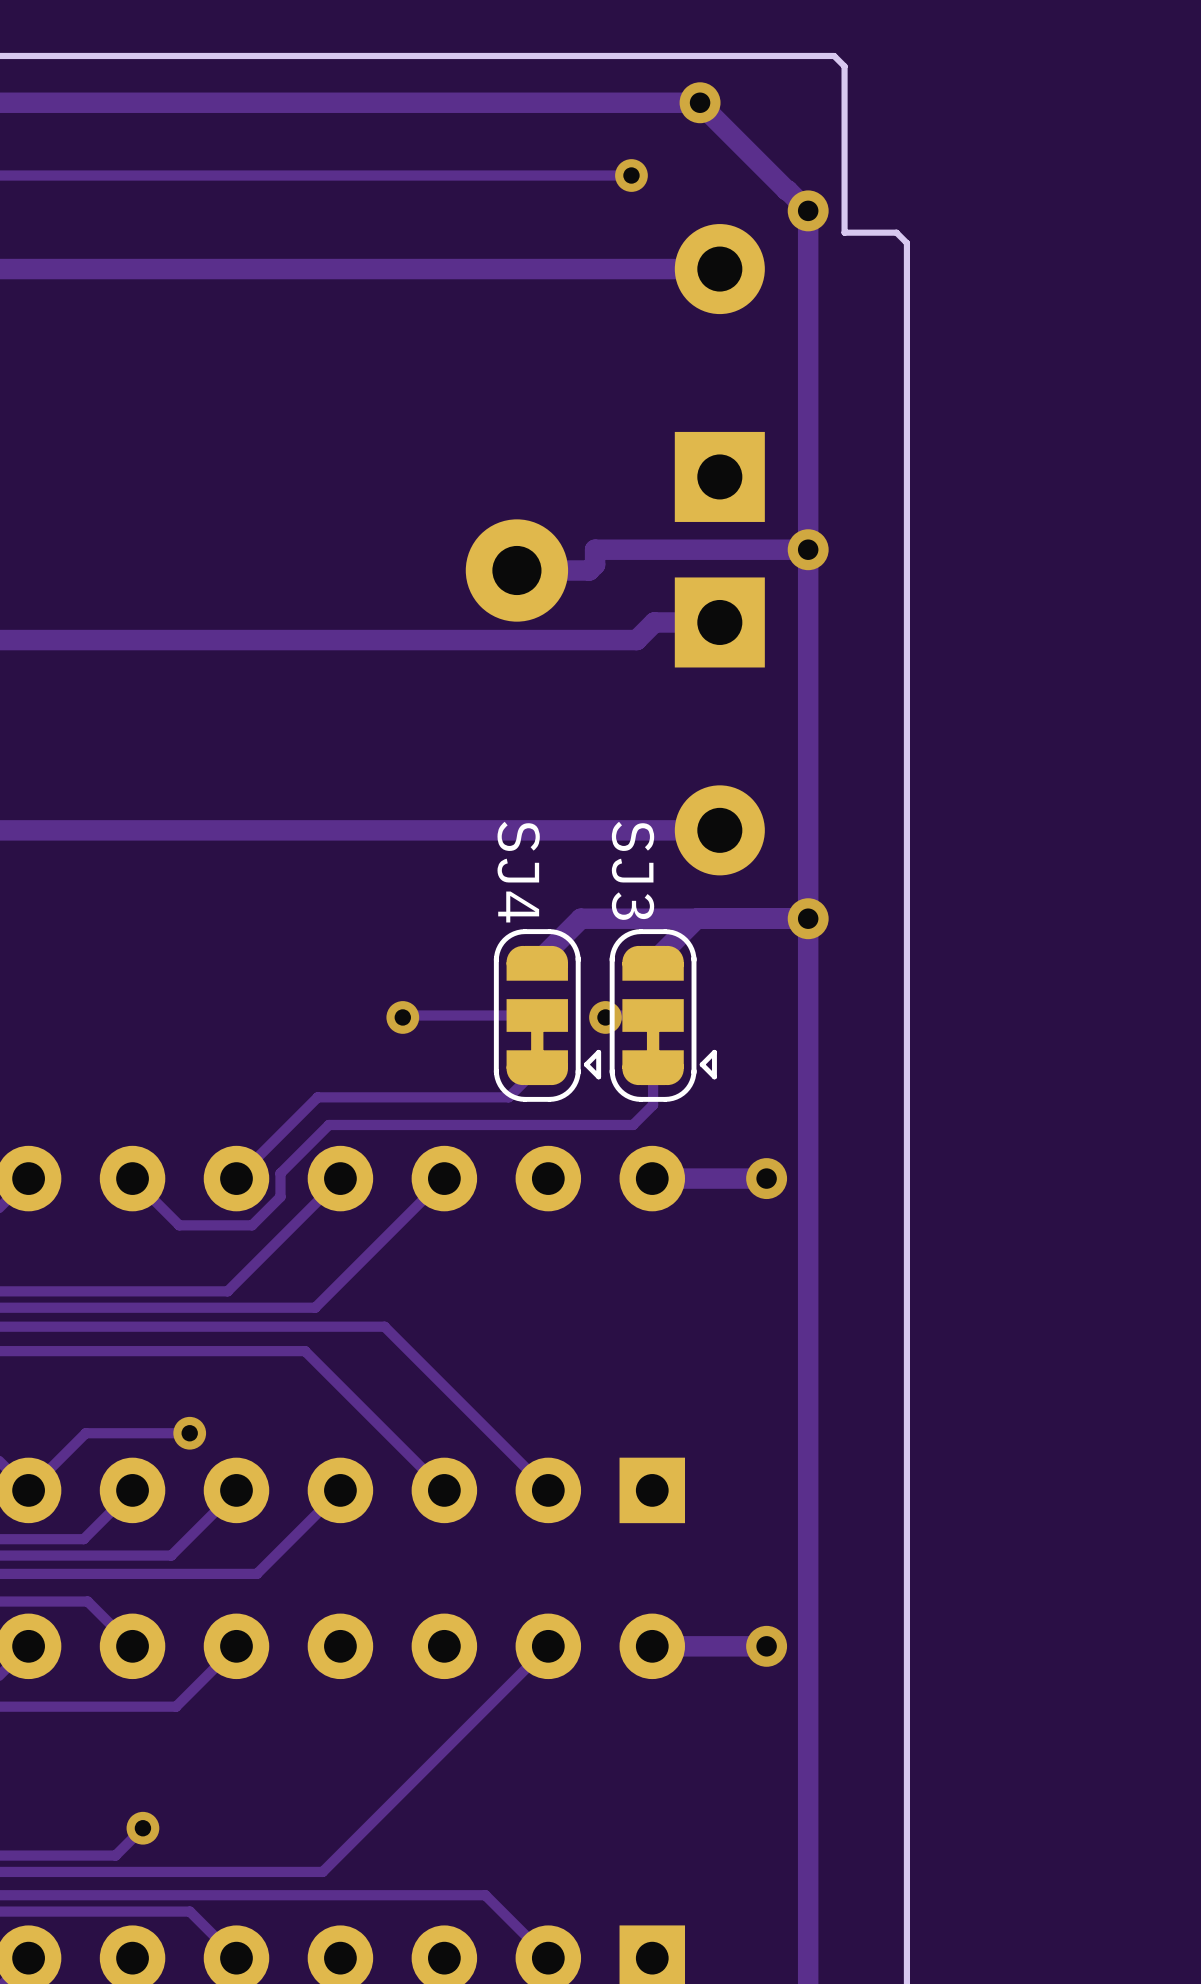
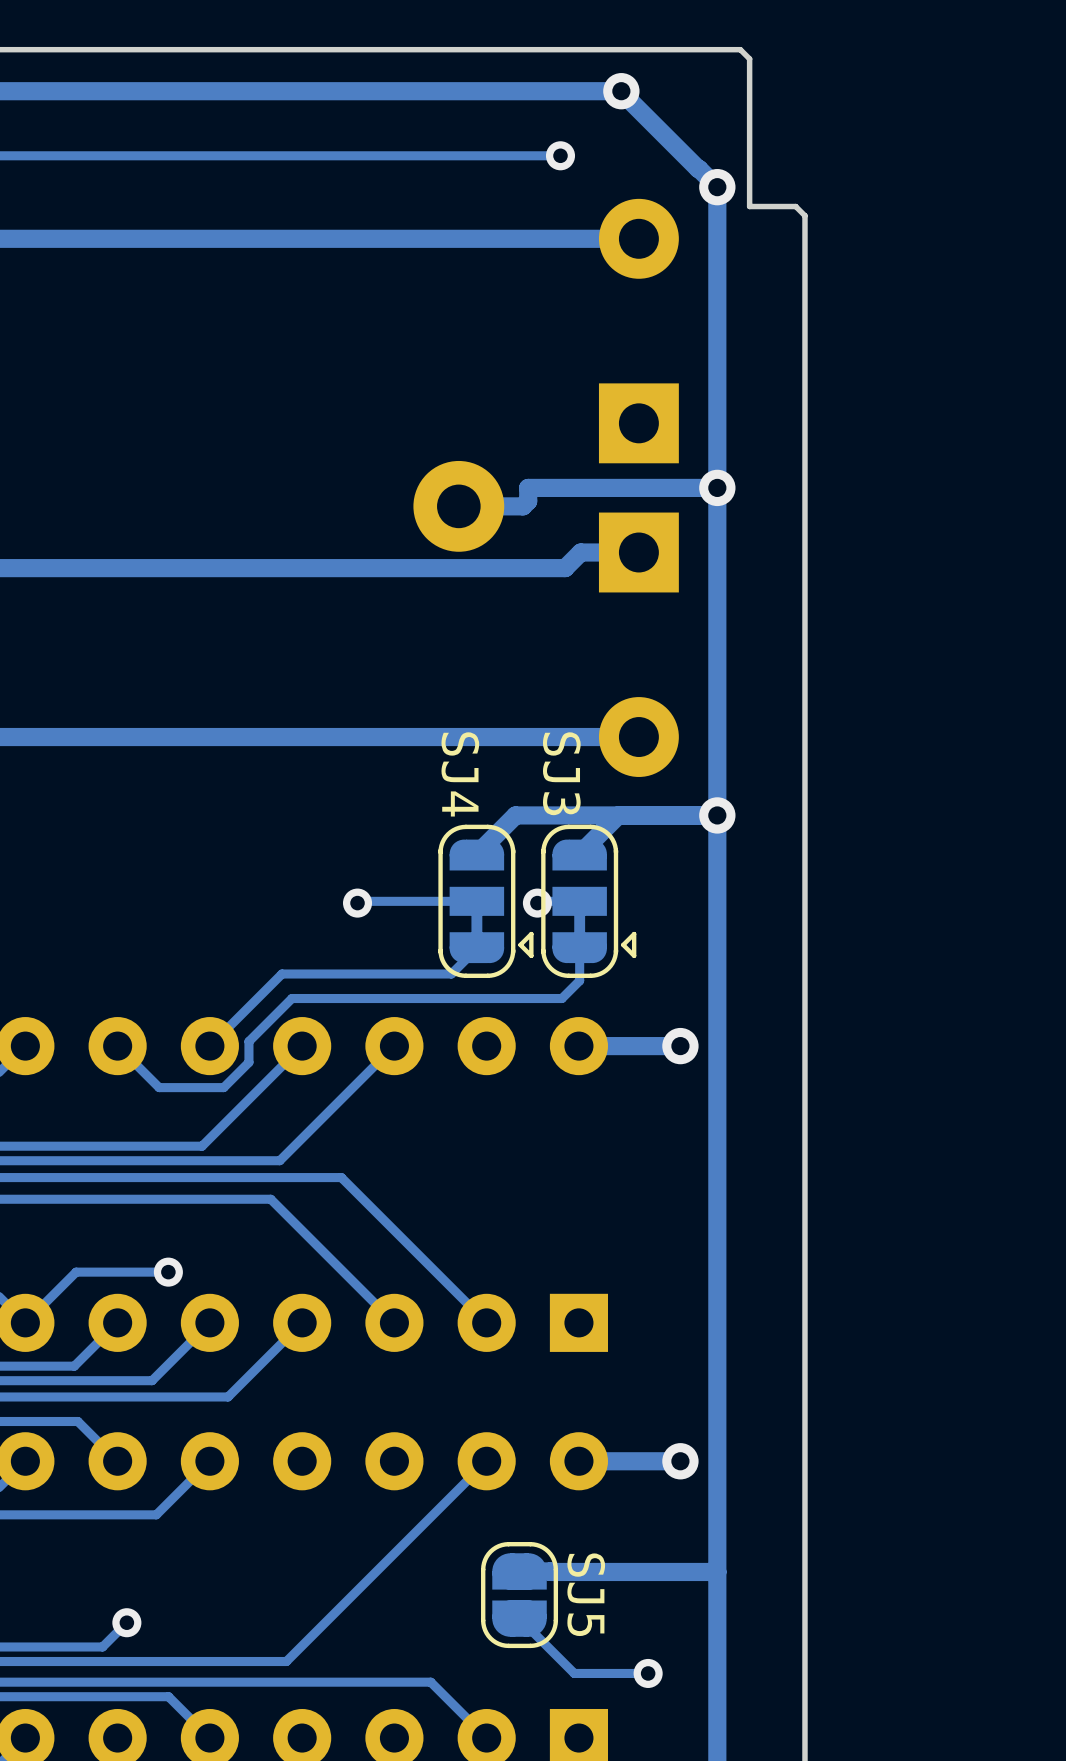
track: none -> (519, 1571) (717, 1571)
SJ5: none -> (519, 1595)
track: none -> (519, 1618) (574, 1673) (648, 1673)
via: none -> (648, 1673)

